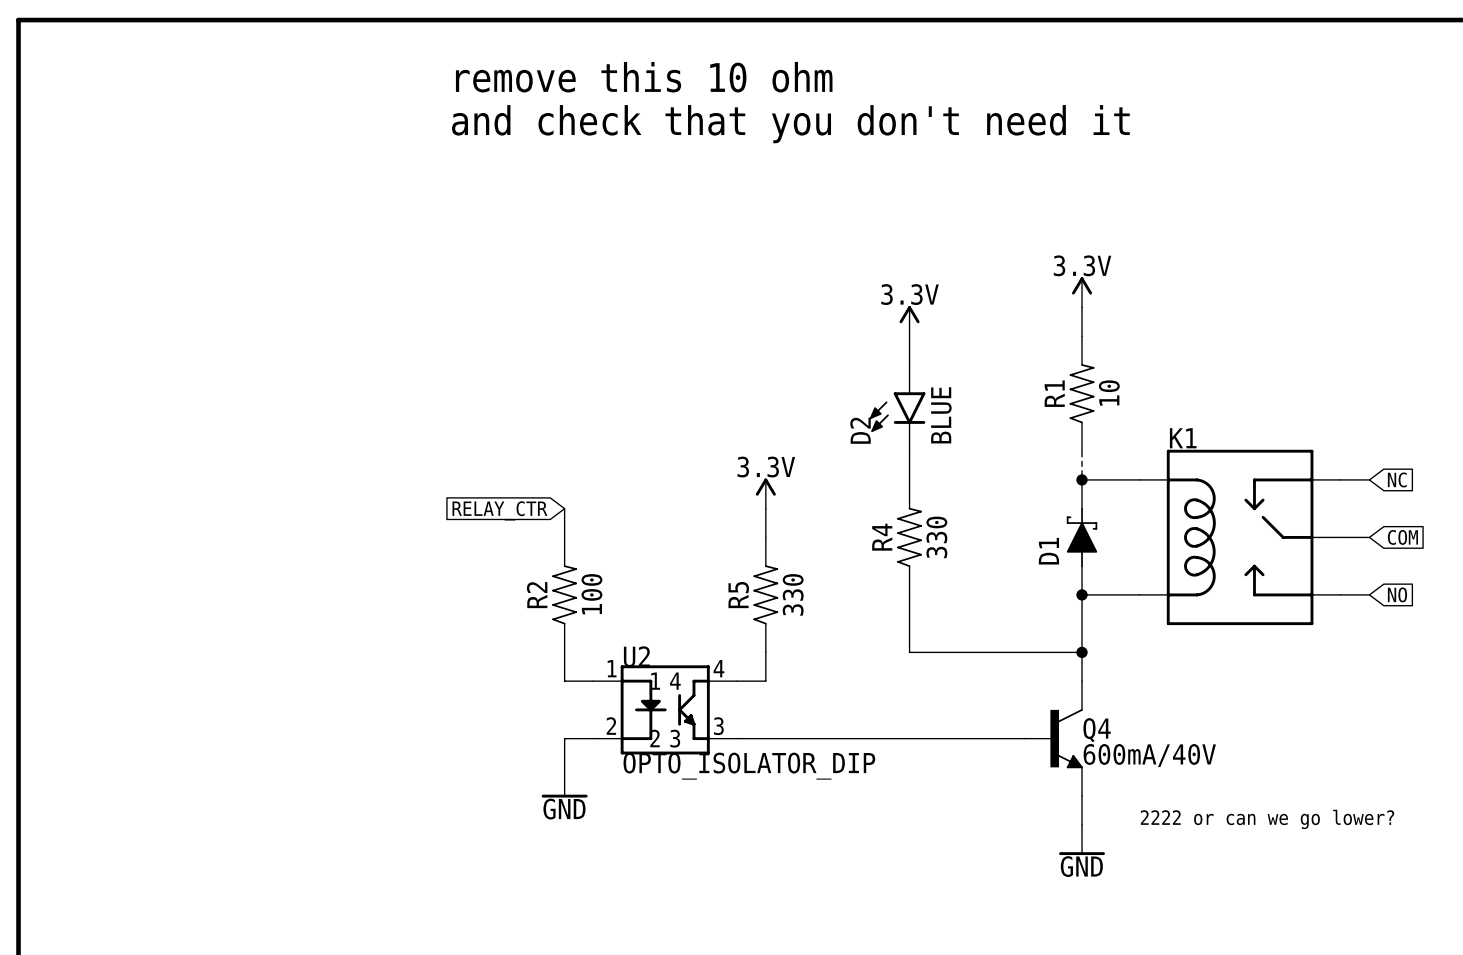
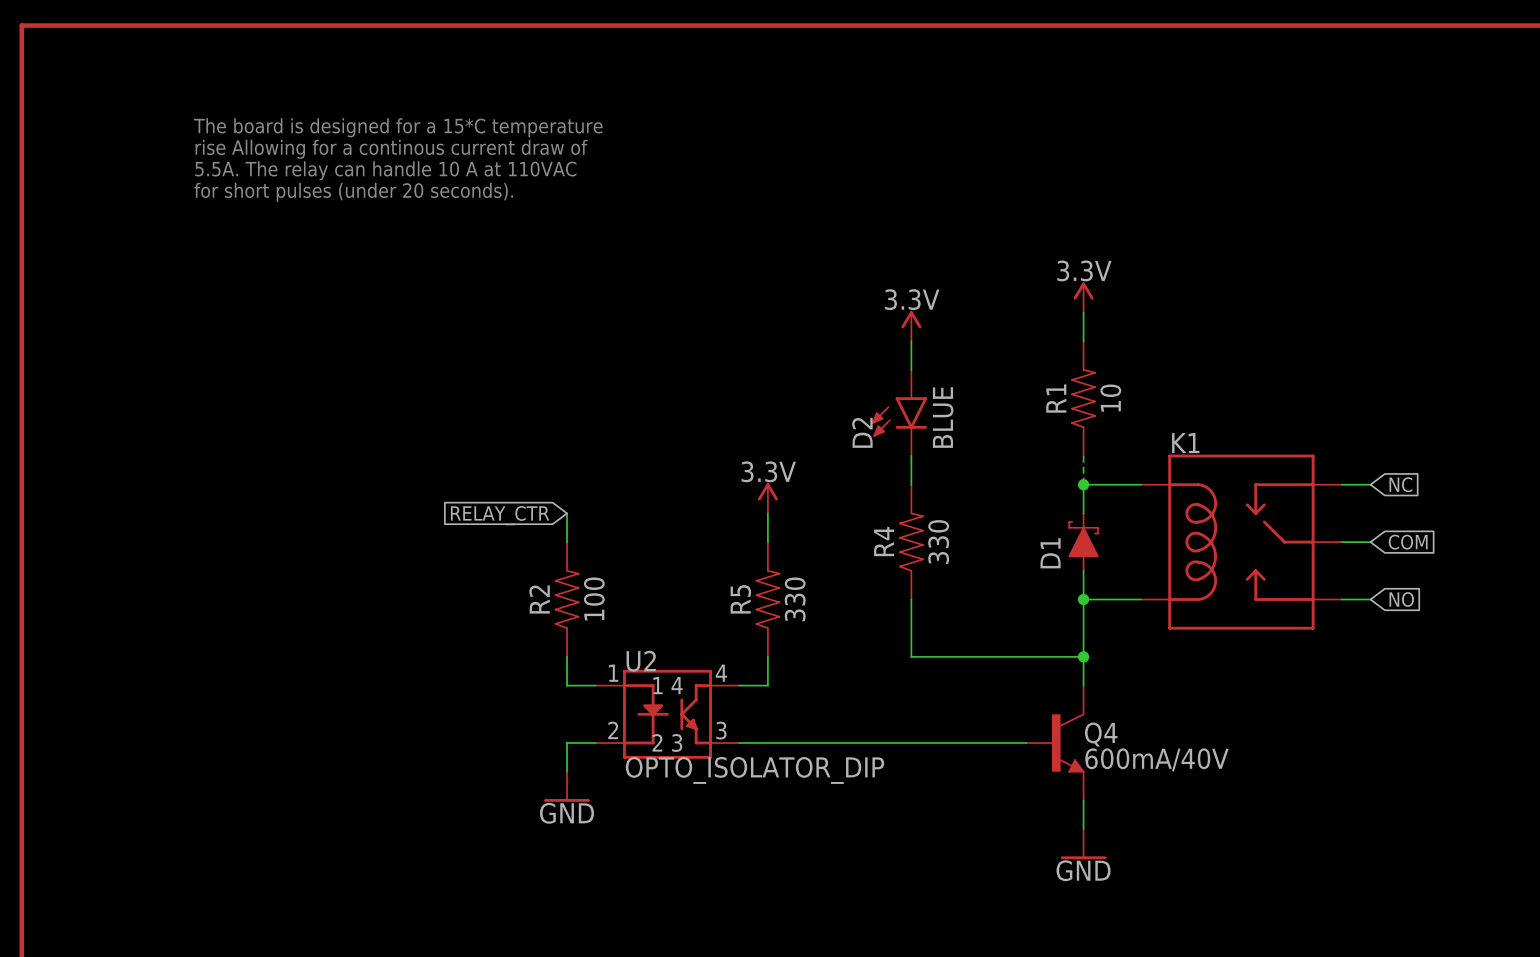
text: remove this 10 ohm (644, 77) -> none
text: none -> The board is designed for a 15*C temperature (398, 127)
text: and check that you don't need it (790, 124) -> none
text: none -> rise Allowing for a continous current draw of (391, 149)
text: none -> 5.5A. The relay can handle 10 A at 110VAC (385, 170)
text: none -> for short pulses (under 20 seconds). (353, 192)
text: 2222 or can we go lower? (1267, 819) -> none

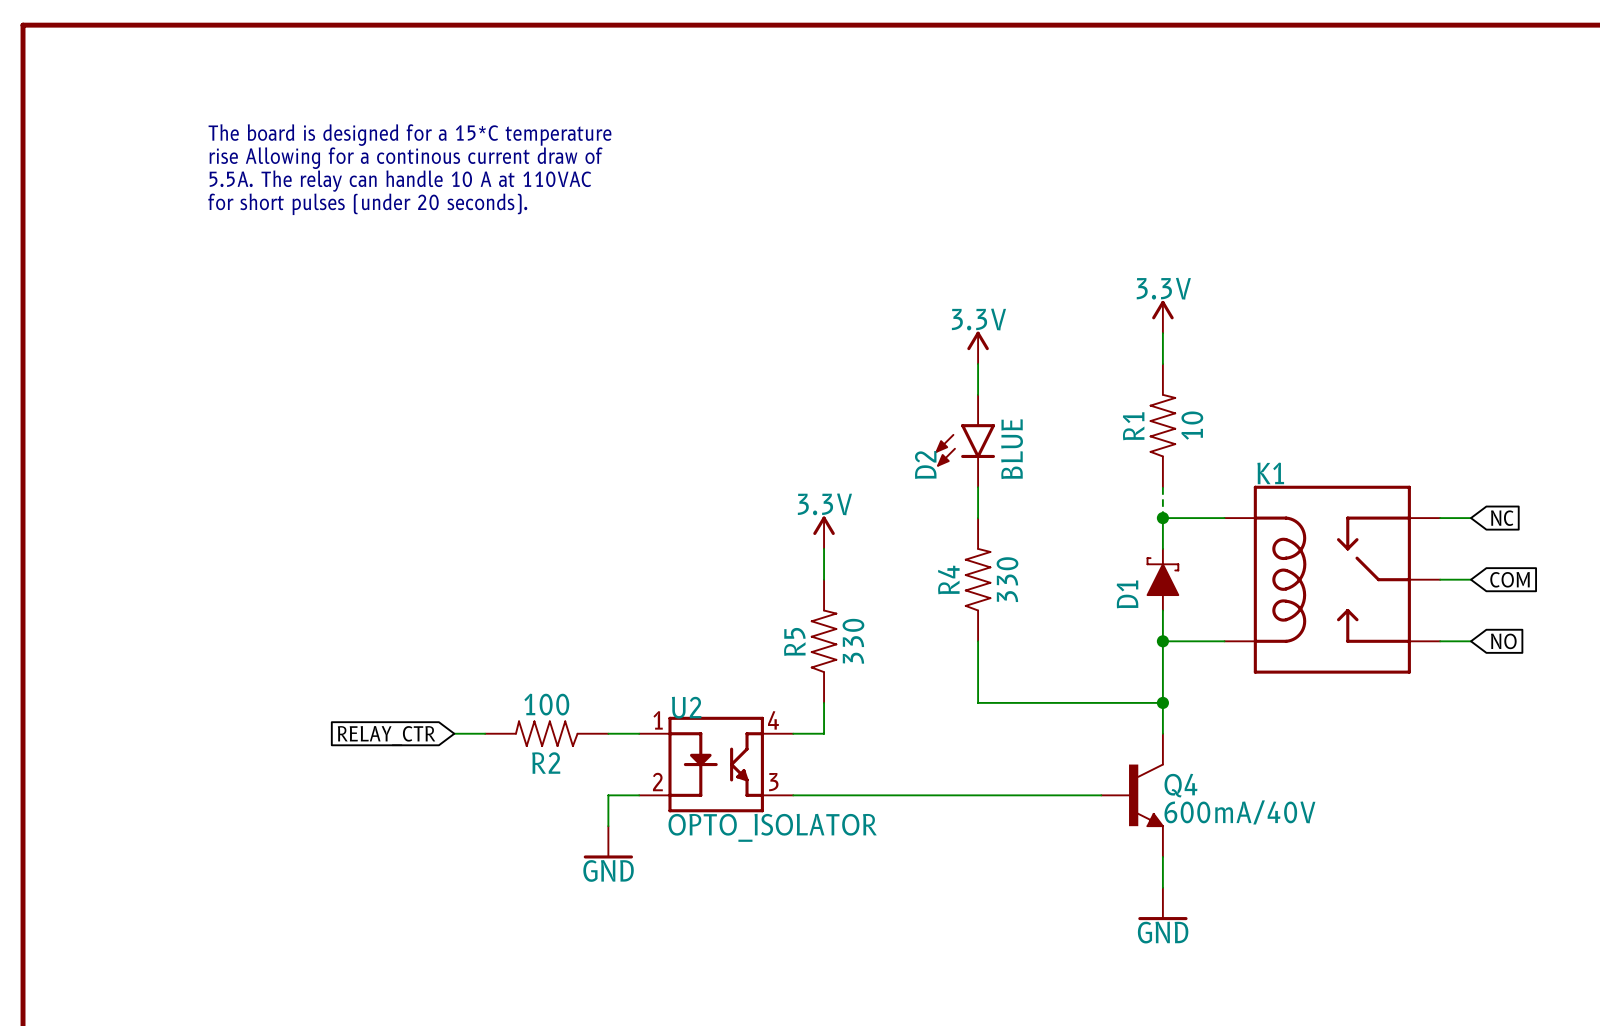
wire: (567, 513) (567, 542) -> none
global label position: RELAY_CTR (500, 515) -> RELAY_CTR (386, 736)
R2 rotation: 0° (567, 599) -> 90° counterclockwise (546, 733)
R2 position: (567, 599) -> (546, 733)
wire: (567, 656) (567, 685) -> none
wire: none -> (454, 733) (485, 733)
U2 pin name: 1 (657, 685) -> none
U2 pin name: 4 (677, 685) -> none
U2 pin name: 2 (657, 742) -> none
U2 pin name: 3 (677, 743) -> none
U2 value: OPTO_ISOLATOR_DIP (754, 770) -> OPTO_ISOLATOR (772, 827)

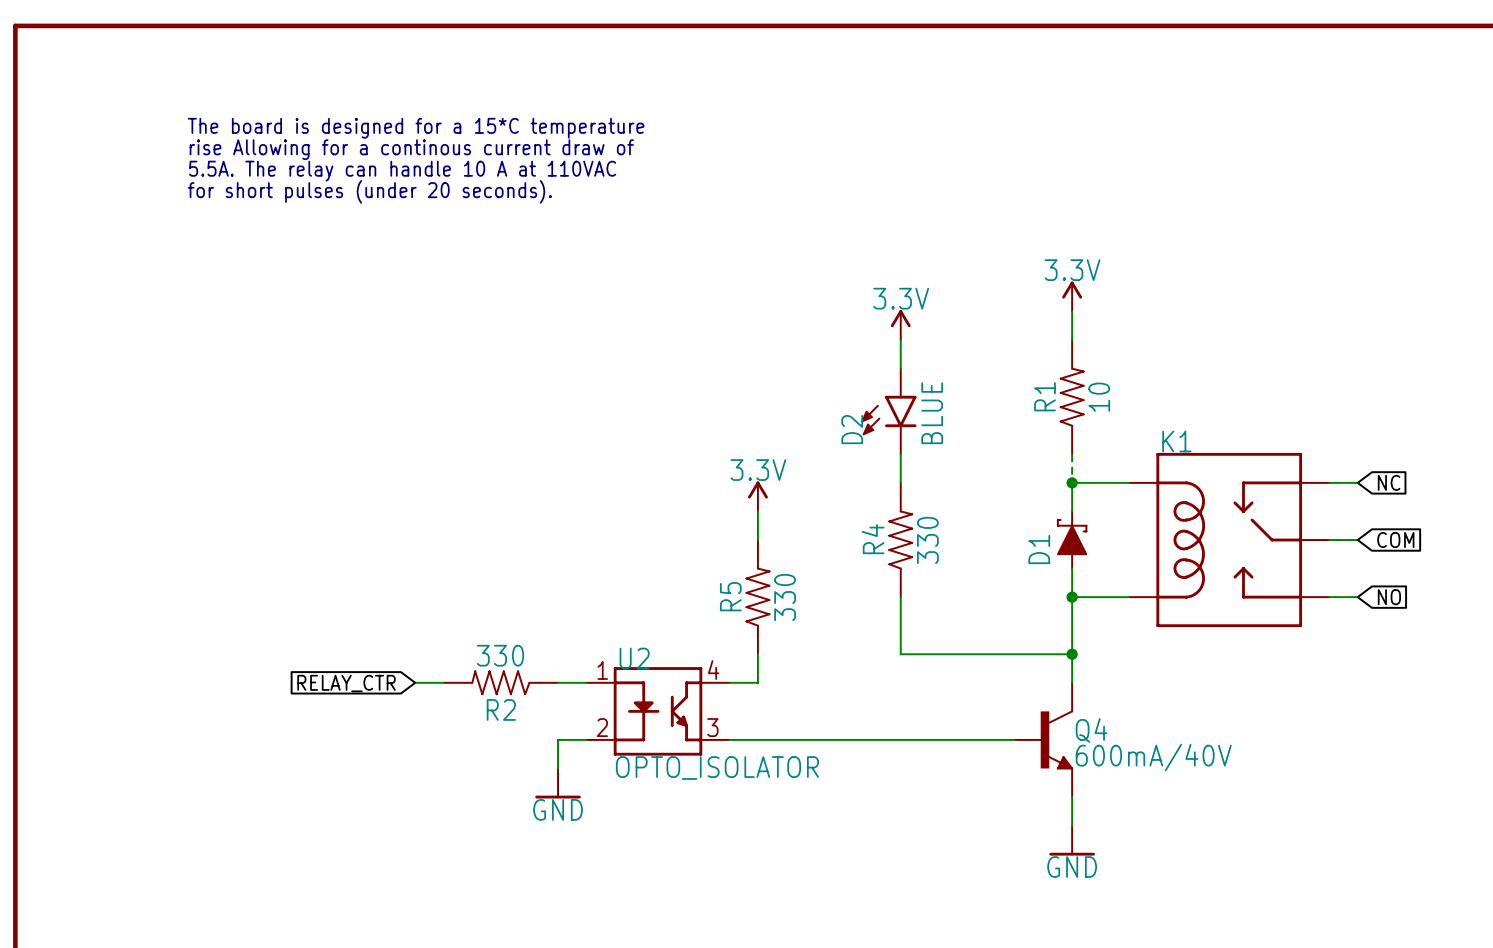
R2 value: 100 (546, 704) -> 330 (500, 655)

